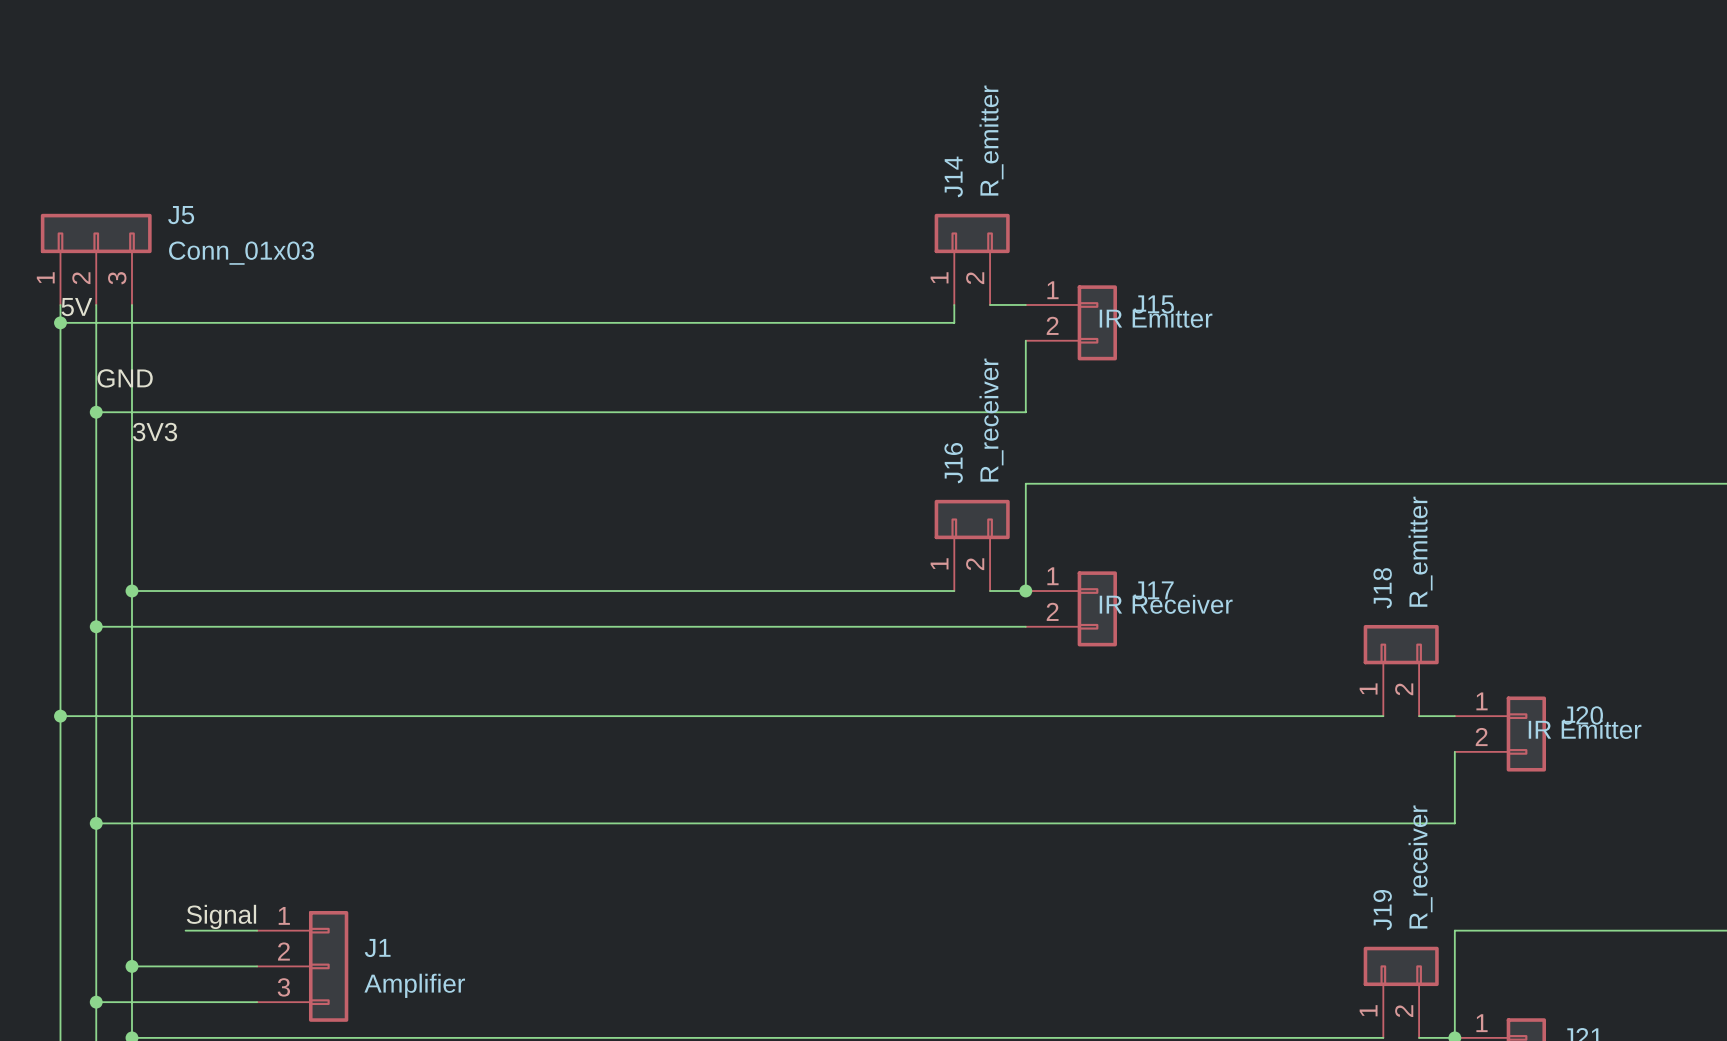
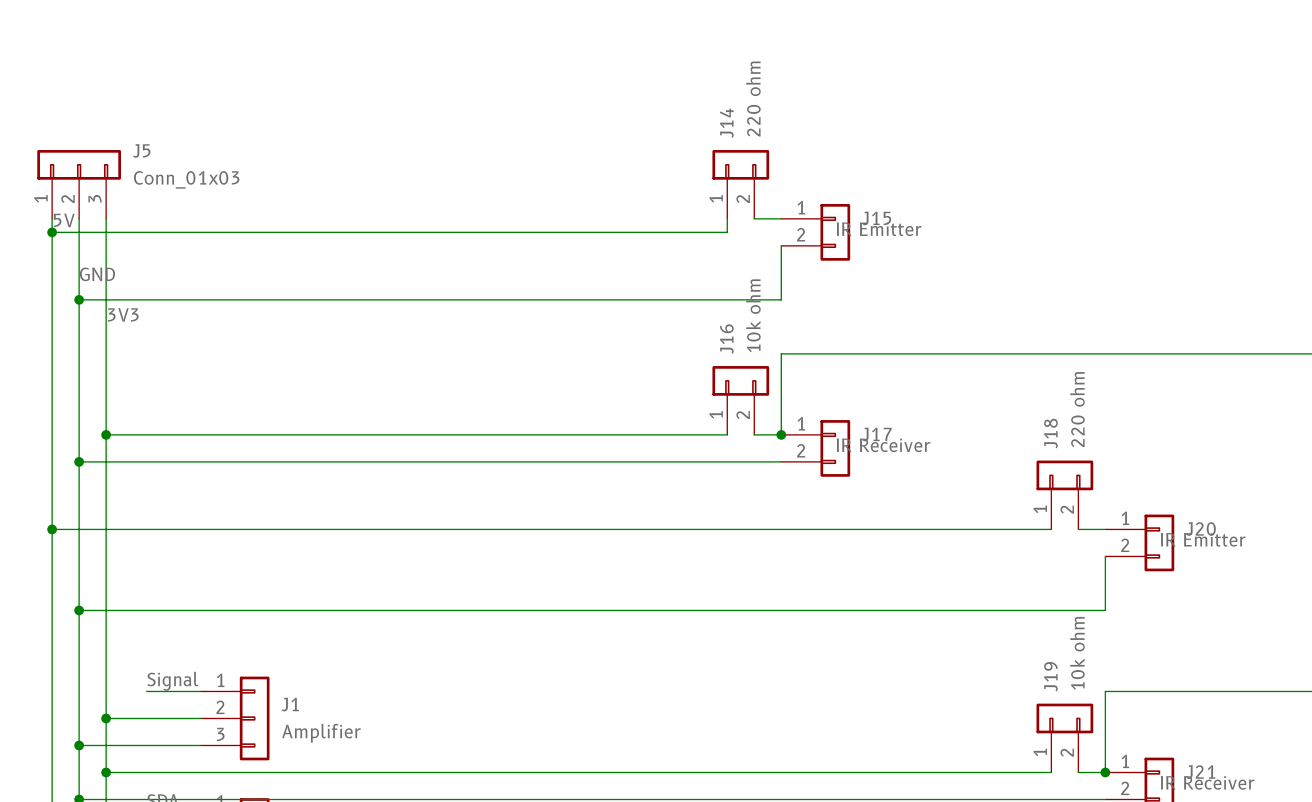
J14 value: R_emitter (991, 140) -> 220 ohm (753, 99)
J16 value: R_receiver (991, 420) -> 10k ohm (753, 315)
J18 value: R_emitter (1420, 551) -> 220 ohm (1077, 409)
J19 value: R_receiver (1420, 866) -> 10k ohm (1077, 653)

